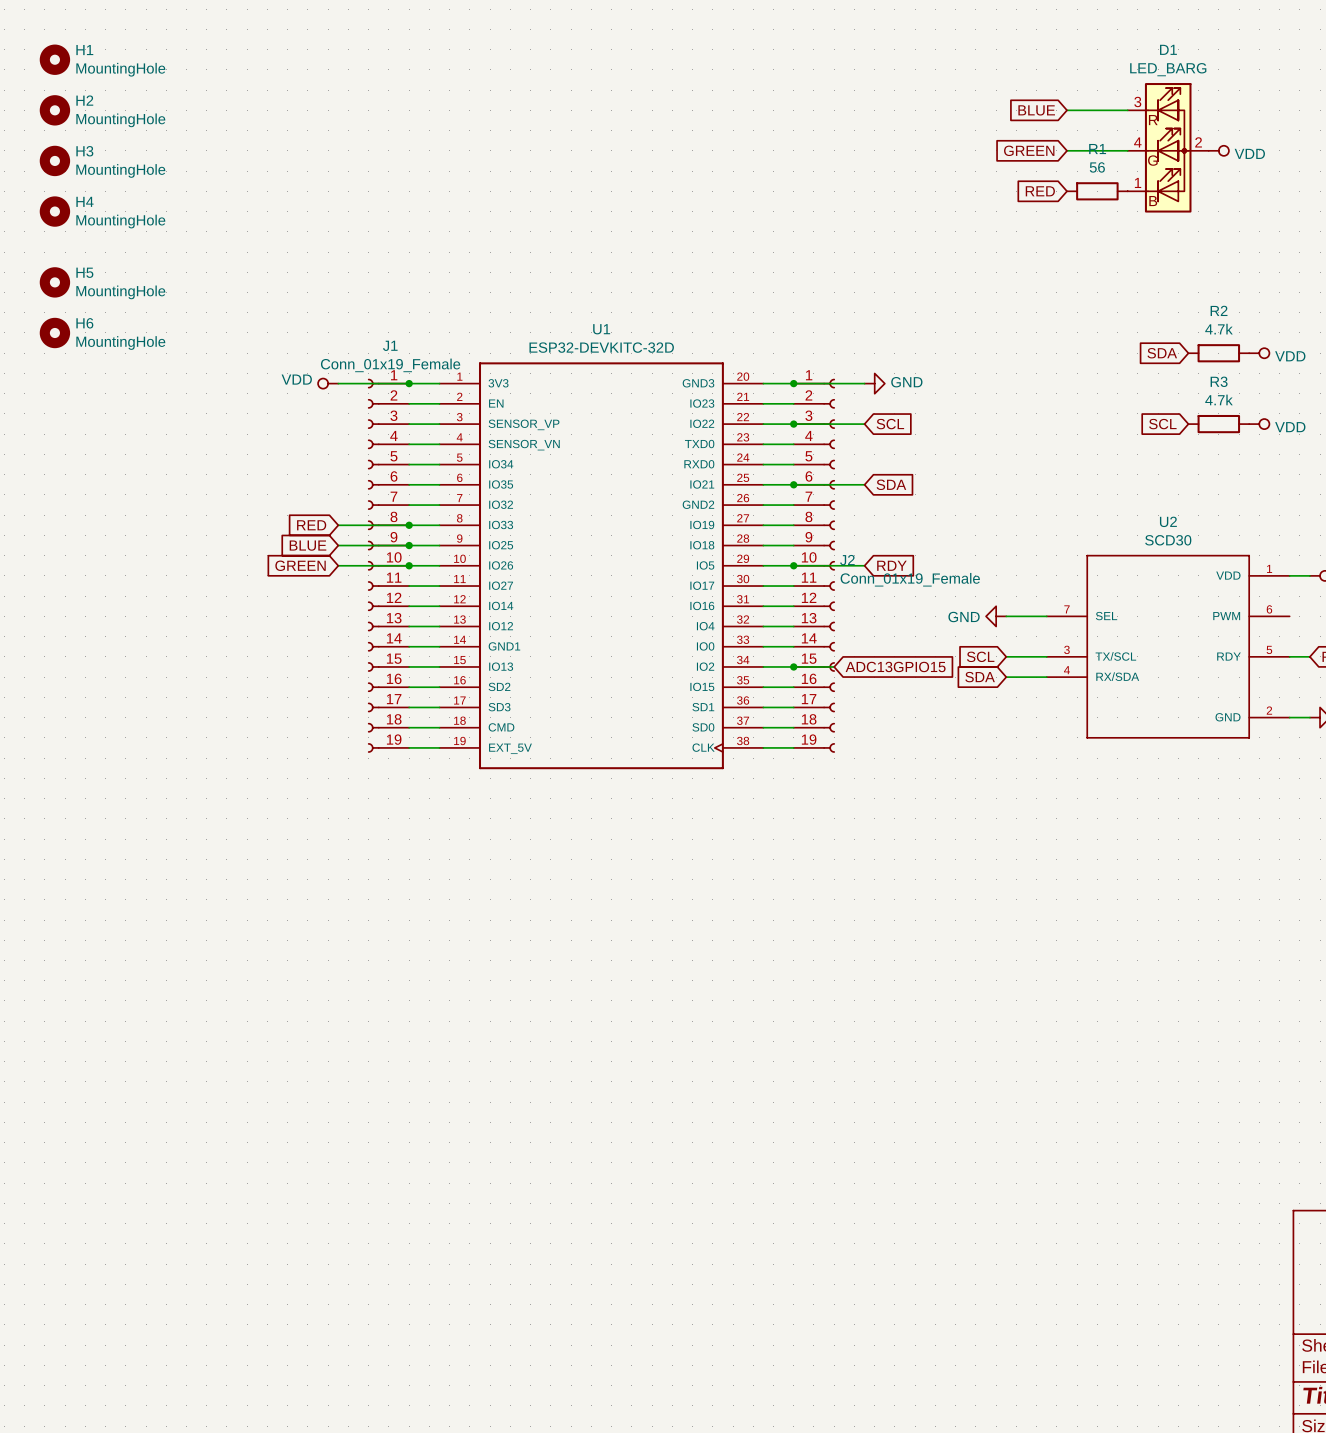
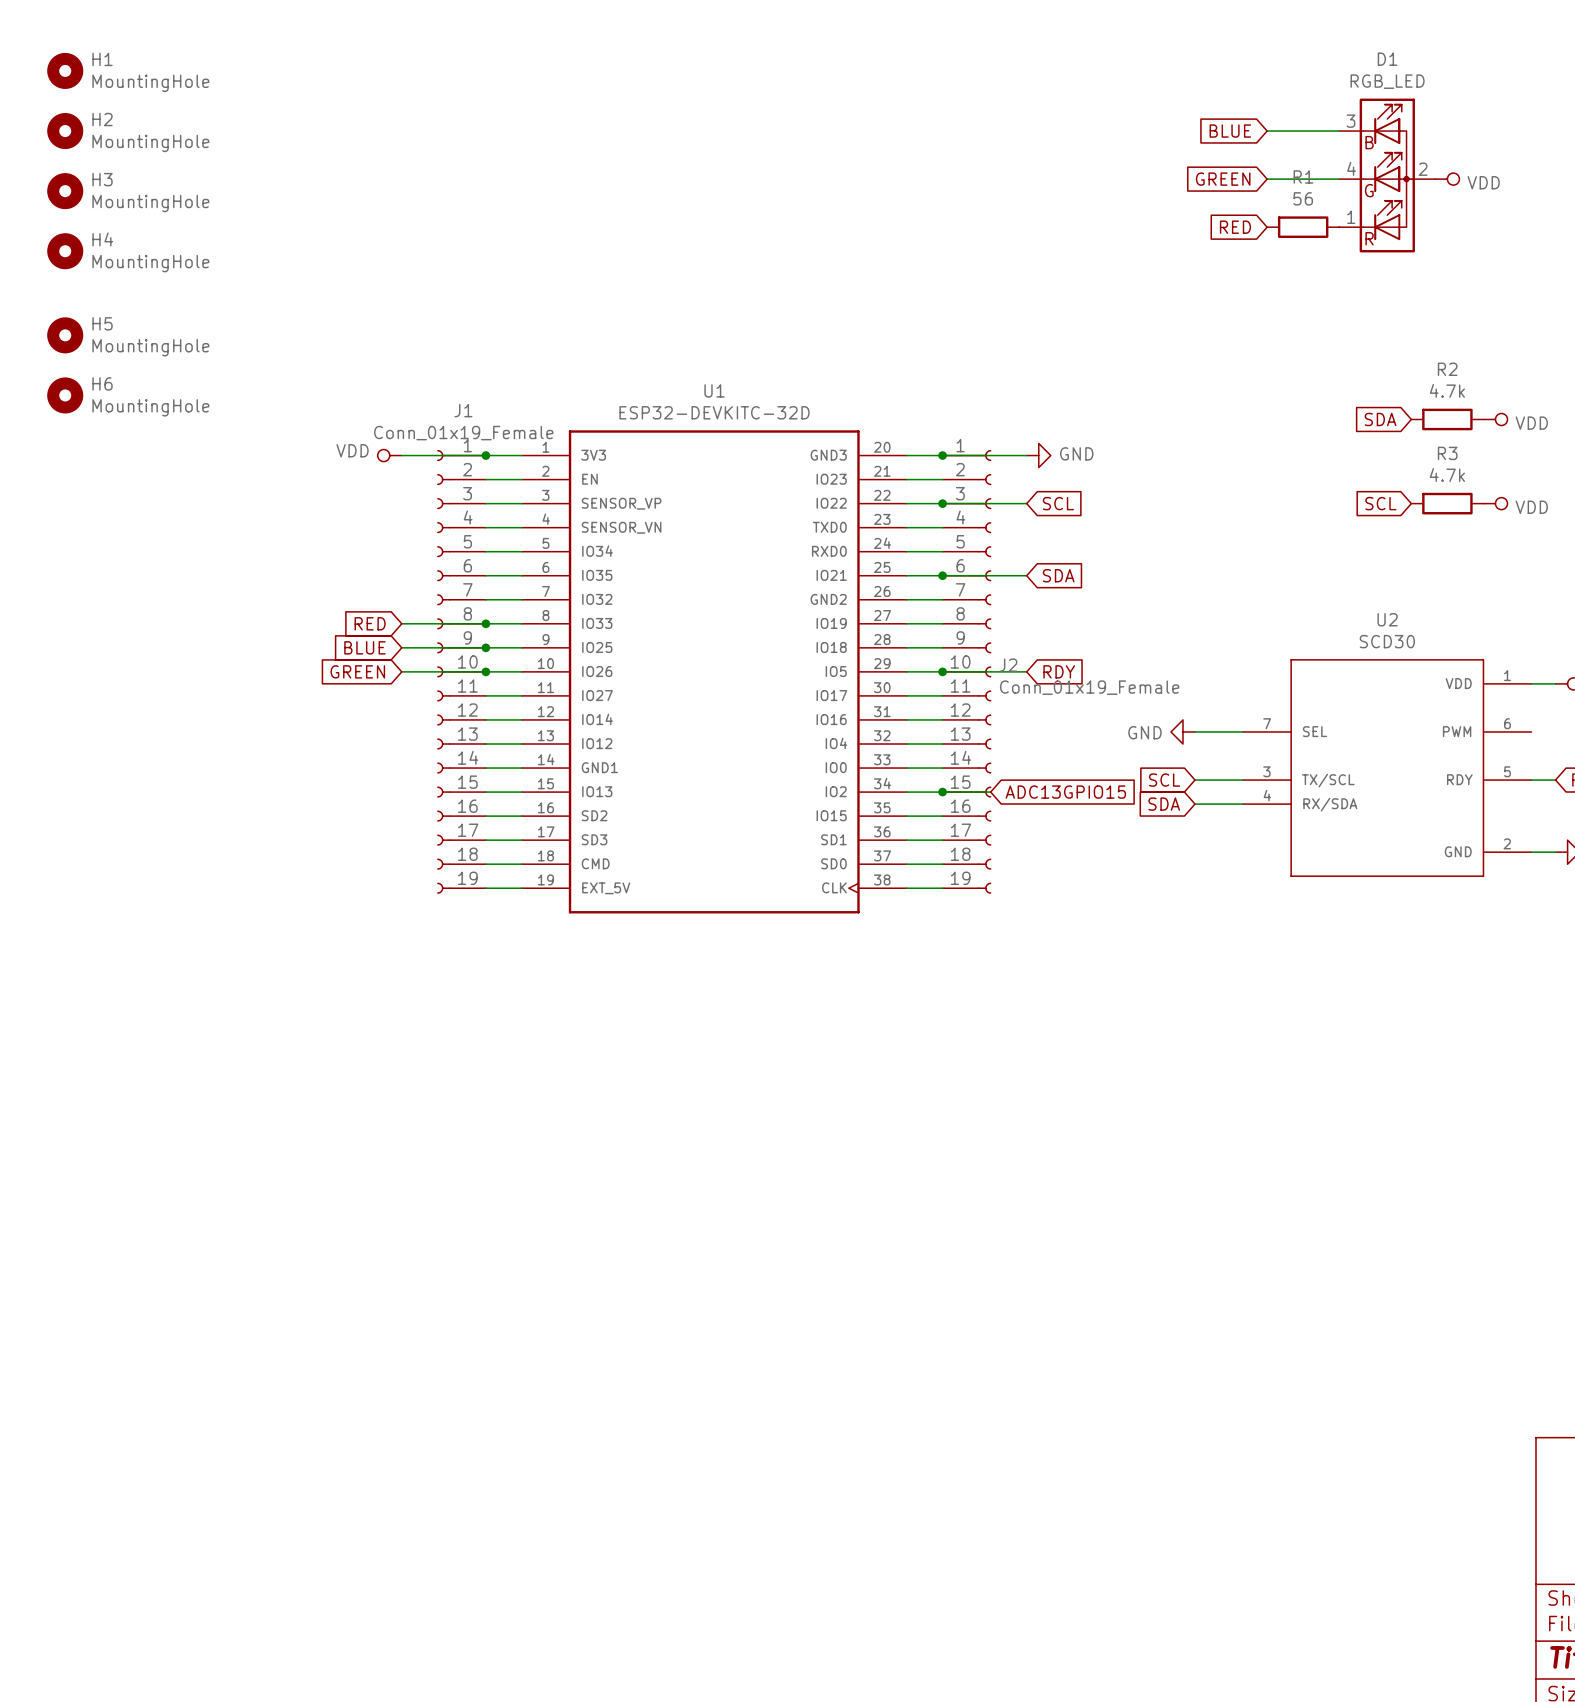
D1 value: LED_BARG (1168, 69) -> RGB_LED (1387, 81)
D1 text: R (1153, 120) -> B (1369, 142)
D1 text: B (1153, 201) -> R (1369, 238)

